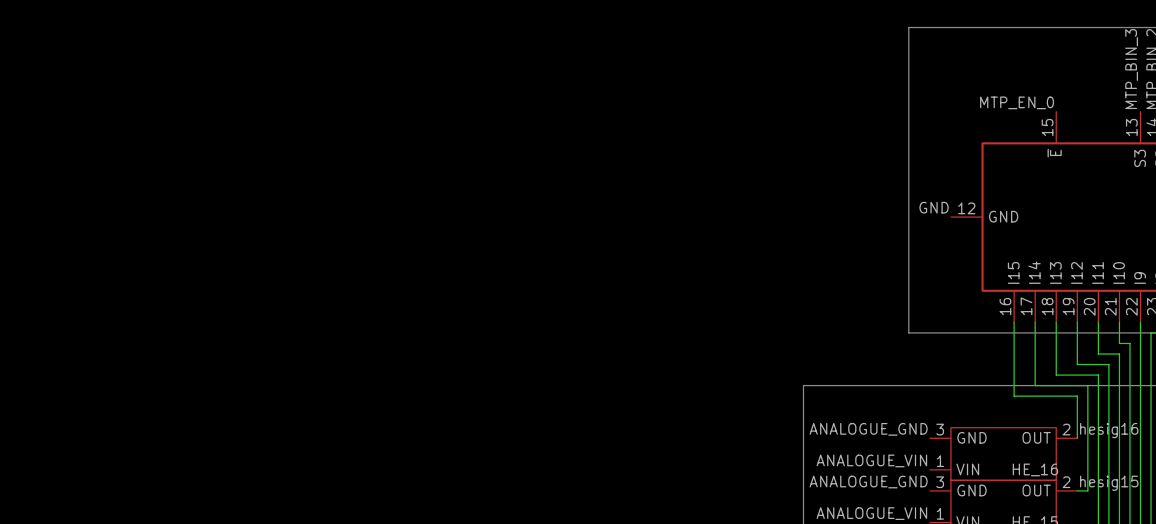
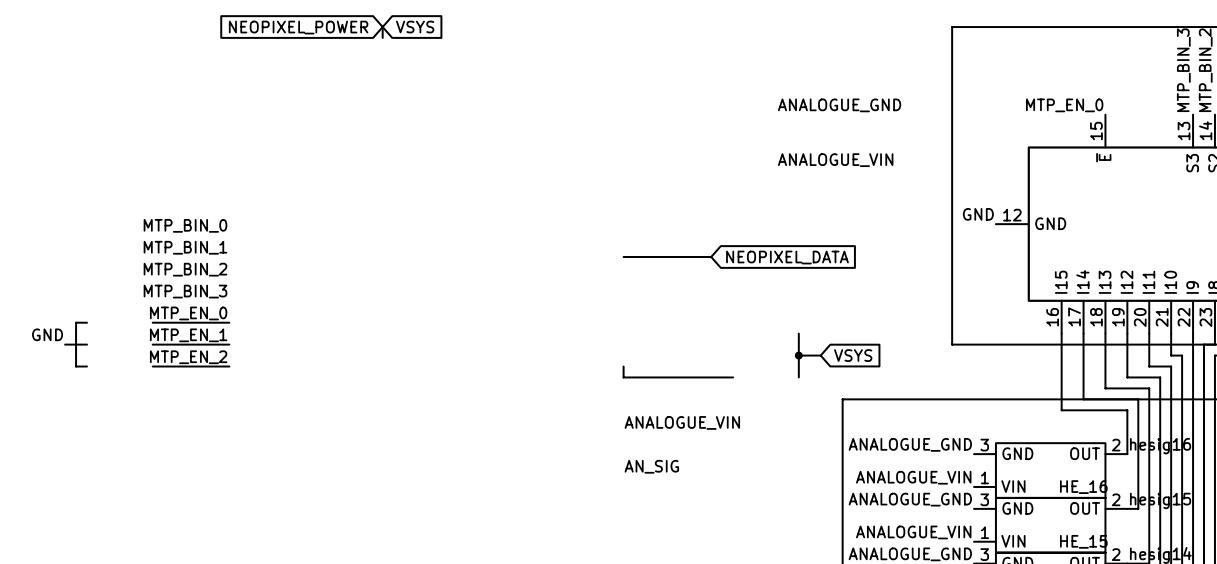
wire: none -> (382, 27) (382, 37)
global label: none -> VSYS (415, 27)
global label: none -> NEOPIXEL_POWER (298, 27)
label: none -> ANALOGUE_GND (839, 105)
label: none -> ANALOGUE_VIN (835, 160)
label: none -> MTP_BIN_0 (185, 225)
label: none -> MTP_BIN_1 (185, 247)
wire: none -> (623, 257) (711, 257)
global label: none -> NEOPIXEL_DATA (787, 257)
label: none -> MTP_BIN_2 (185, 269)
label: none -> MTP_BIN_3 (185, 291)
label: none -> MTP_EN_0 (188, 313)
wire: none -> (87, 322) (76, 322) (76, 366) (87, 366)
wire: none -> (152, 322) (229, 322)
wire: none -> (798, 333) (798, 377)
label: none -> GND (47, 334)
label: none -> MTP_EN_1 (188, 335)
wire: none -> (65, 344) (87, 344)
wire: none -> (152, 344) (229, 344)
wire: none -> (798, 355) (820, 355)
junction: none -> (798, 355)
global label: none -> VSYS (853, 355)
label: none -> MTP_EN_2 (188, 357)
wire: none -> (152, 366) (229, 366)
wire: none -> (623, 366) (623, 377) (733, 377)
label: none -> ANALOGUE_VIN (682, 422)
label: none -> AN_SIG (651, 466)

